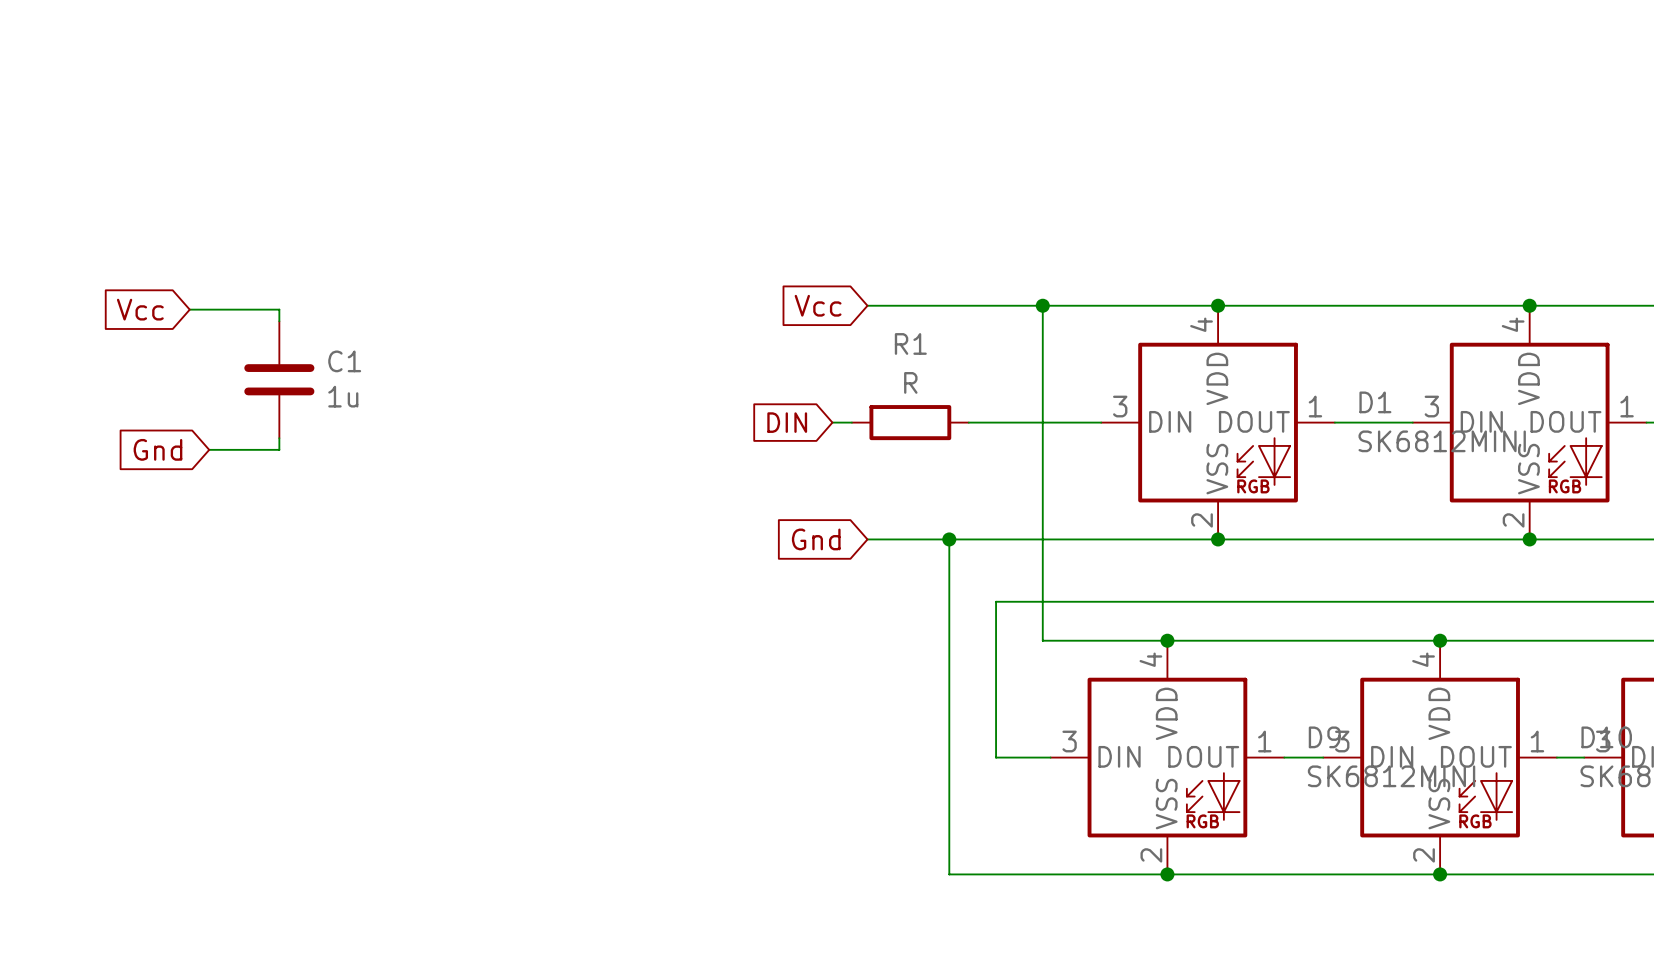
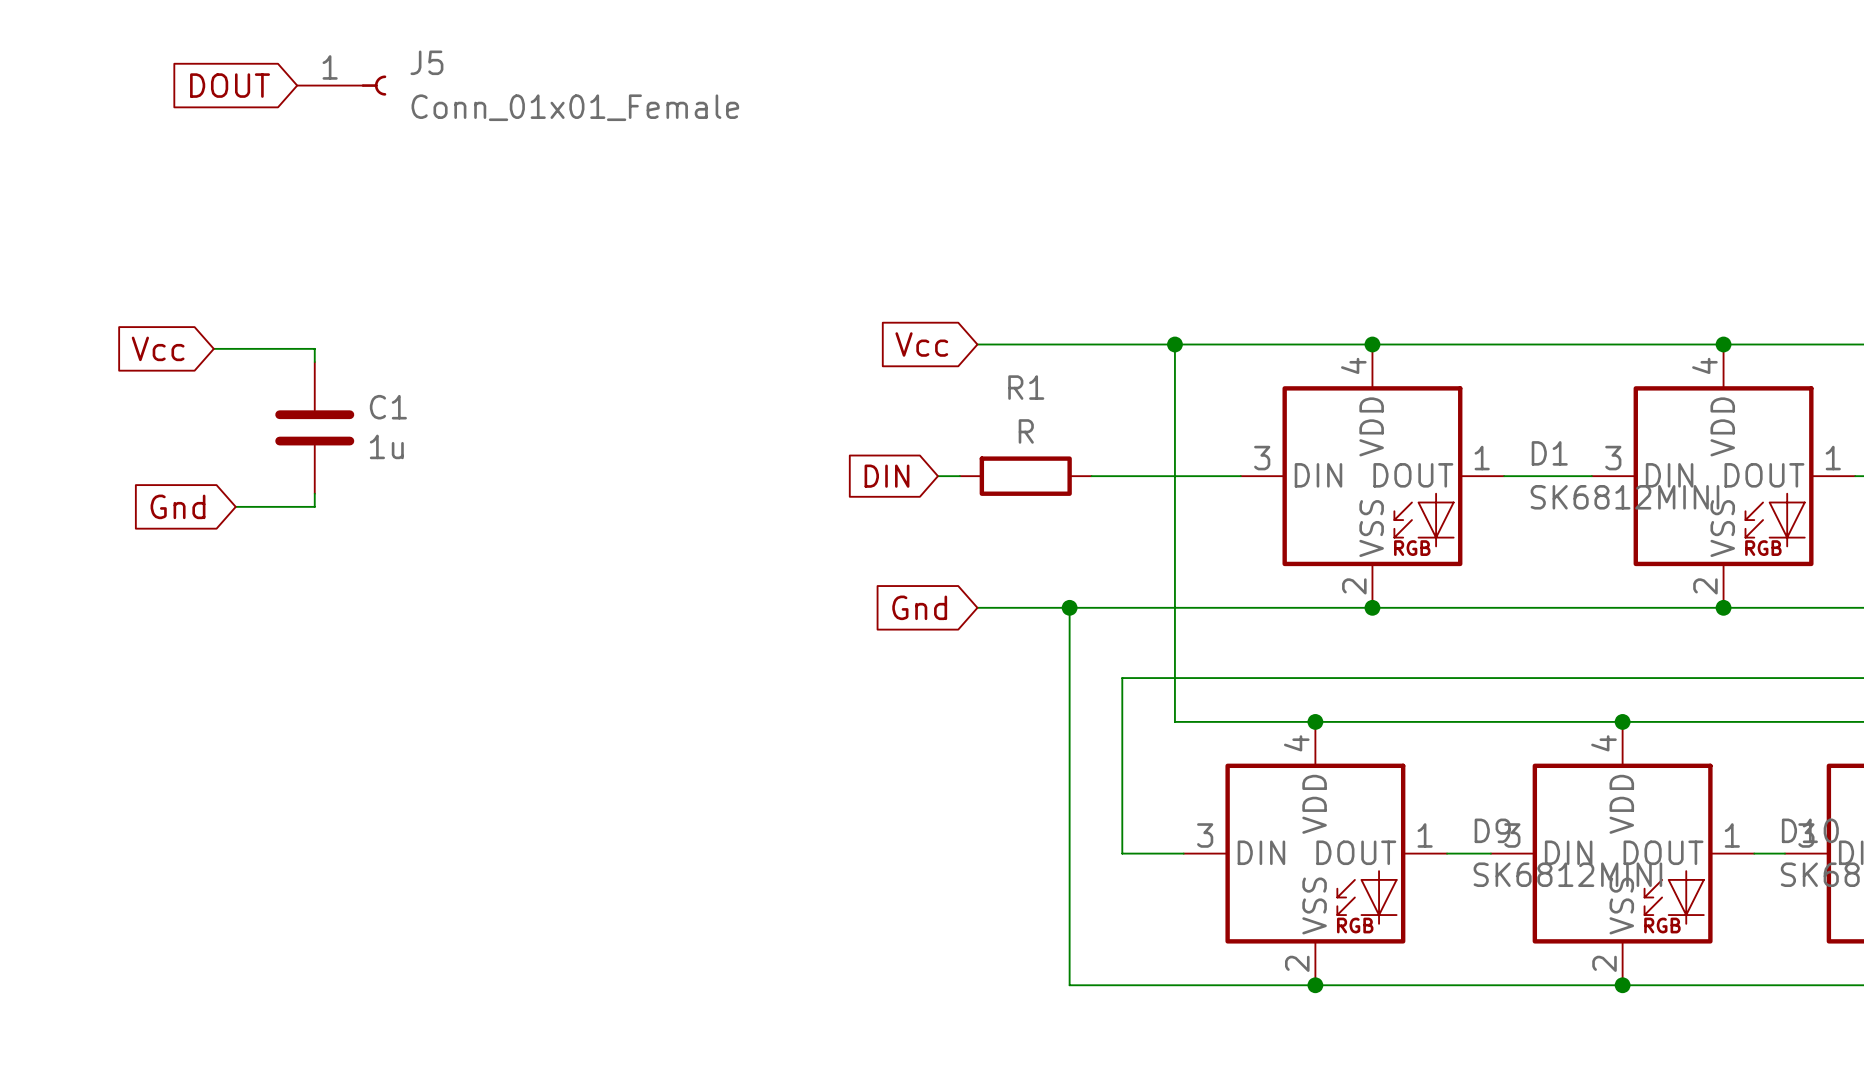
global label: none -> DOUT (230, 85)
J5: none -> Conn_01x01_Female (341, 85)

